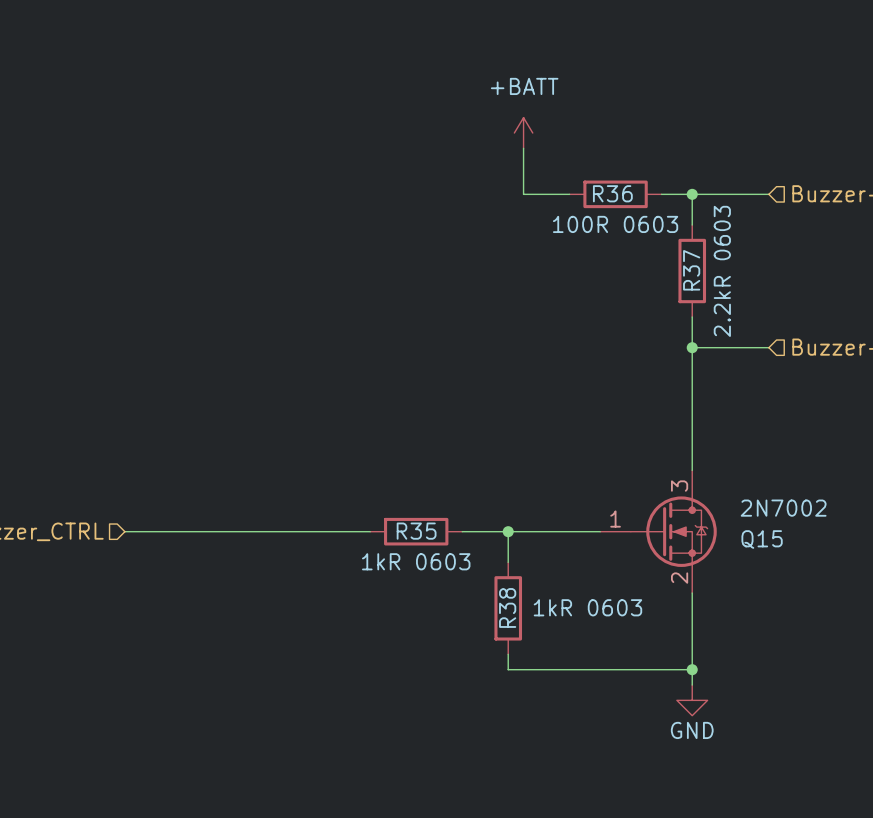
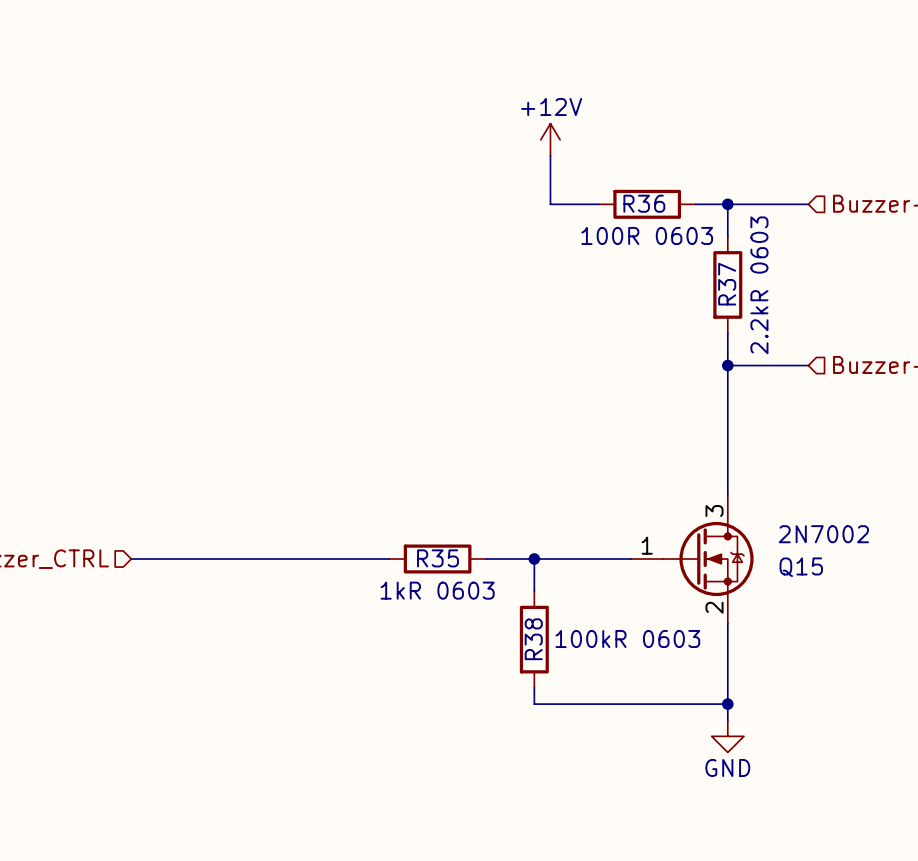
power symbol: +BATT (523, 133) -> +12V (550, 139)
R38 value: 1kR 0603 (587, 607) -> 100kR 0603 (627, 639)

